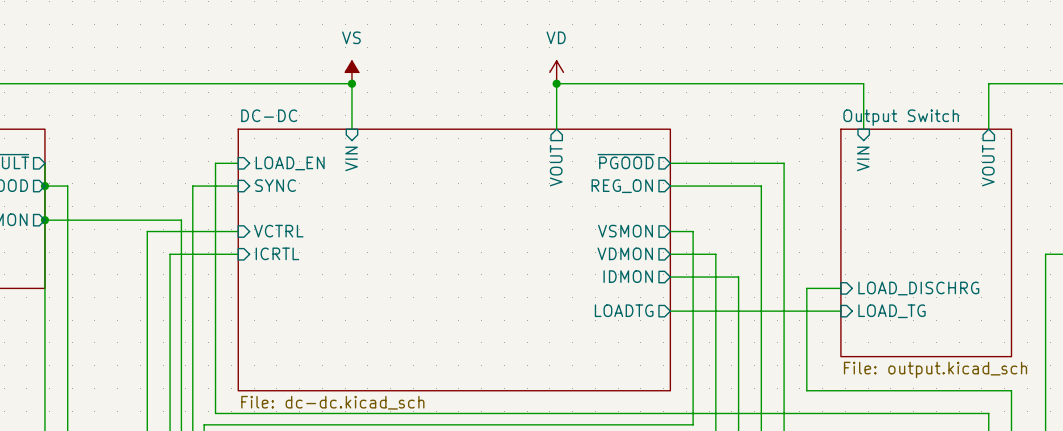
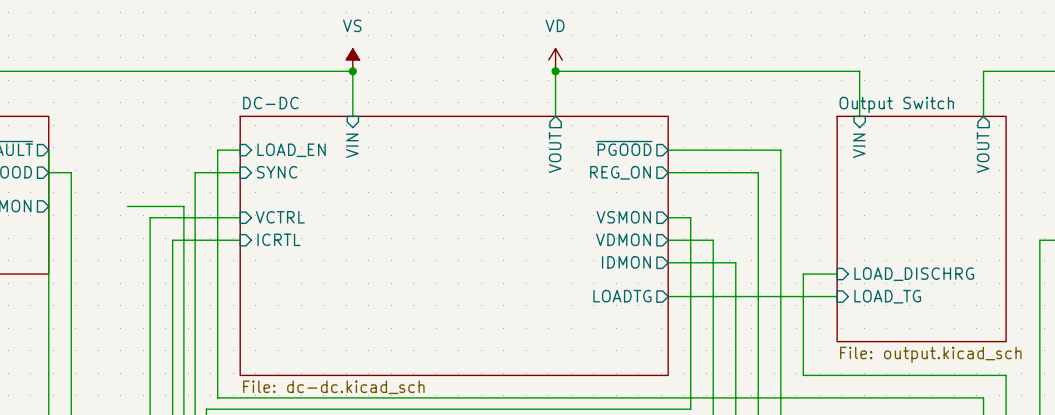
junction: (44, 186) -> none
wire: (44, 220) (124, 220) -> none
junction: (44, 220) -> none

